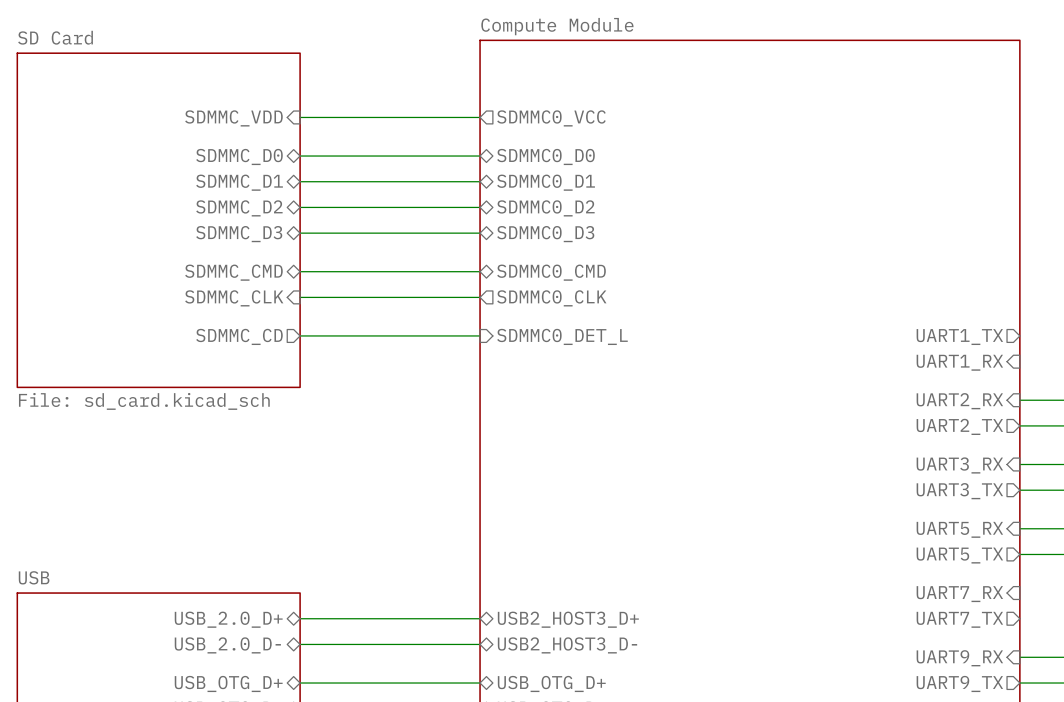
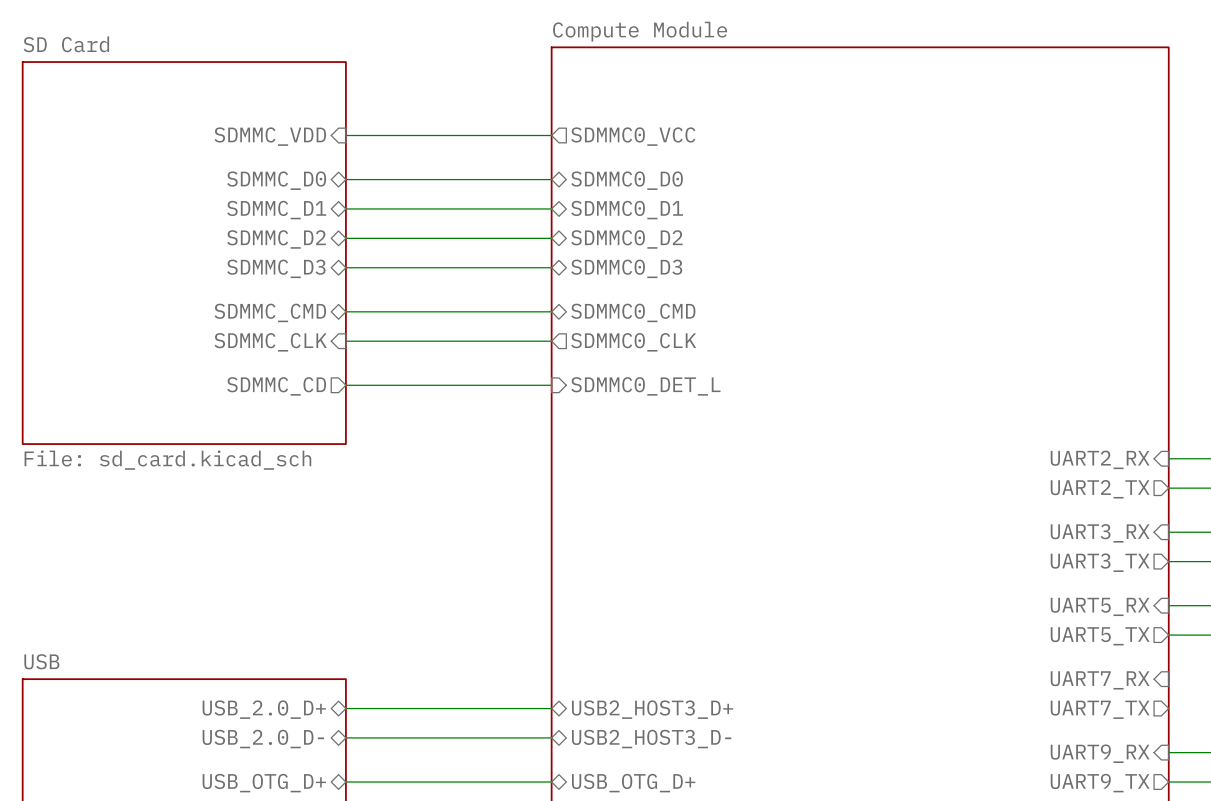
sheet pin: UART1_TX (959, 337) -> none
sheet pin: UART1_RX (959, 362) -> none

